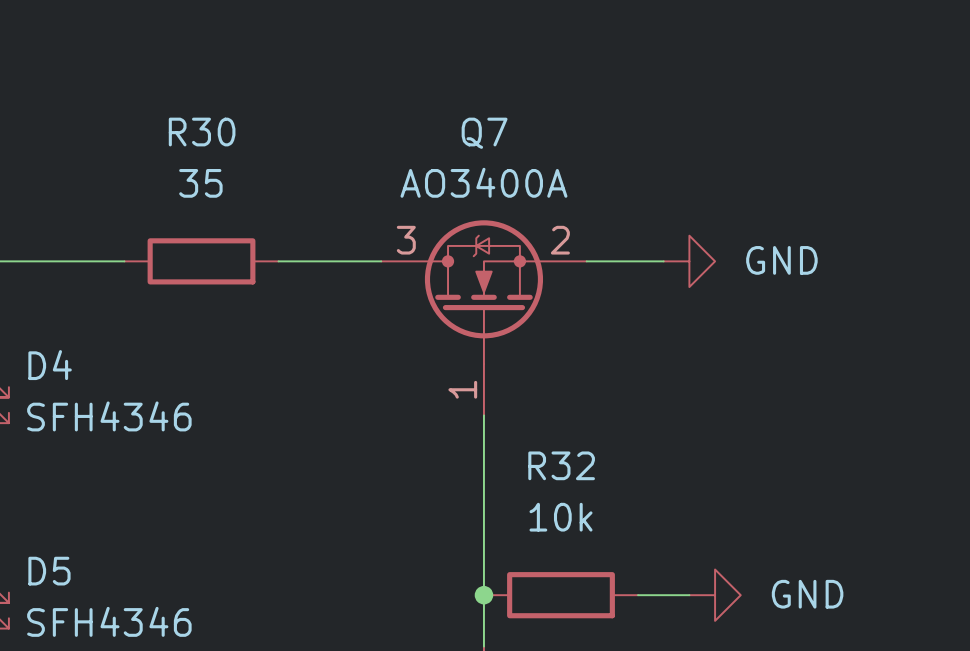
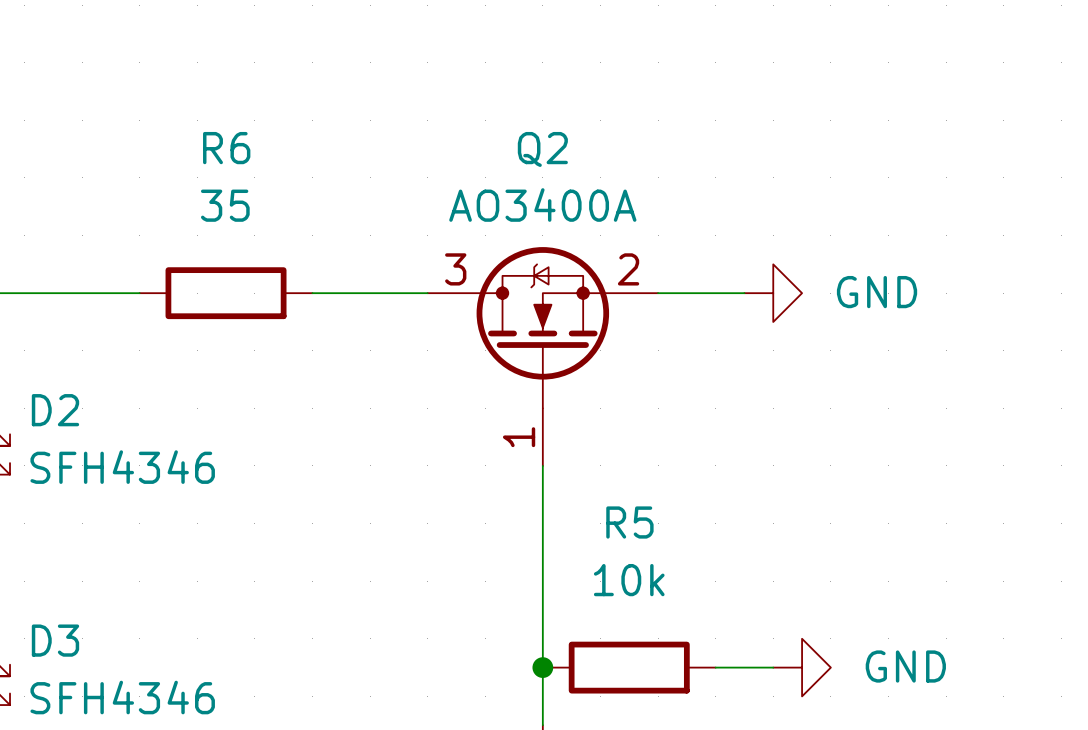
R30 name: R30 (202, 132) -> R6 (226, 148)
Q7 name: Q7 (484, 133) -> Q2 (542, 149)
D4 name: D4 (50, 365) -> D2 (55, 410)
R32 name: R32 (561, 465) -> R5 (629, 522)
D5 name: D5 (49, 571) -> D3 (55, 640)

